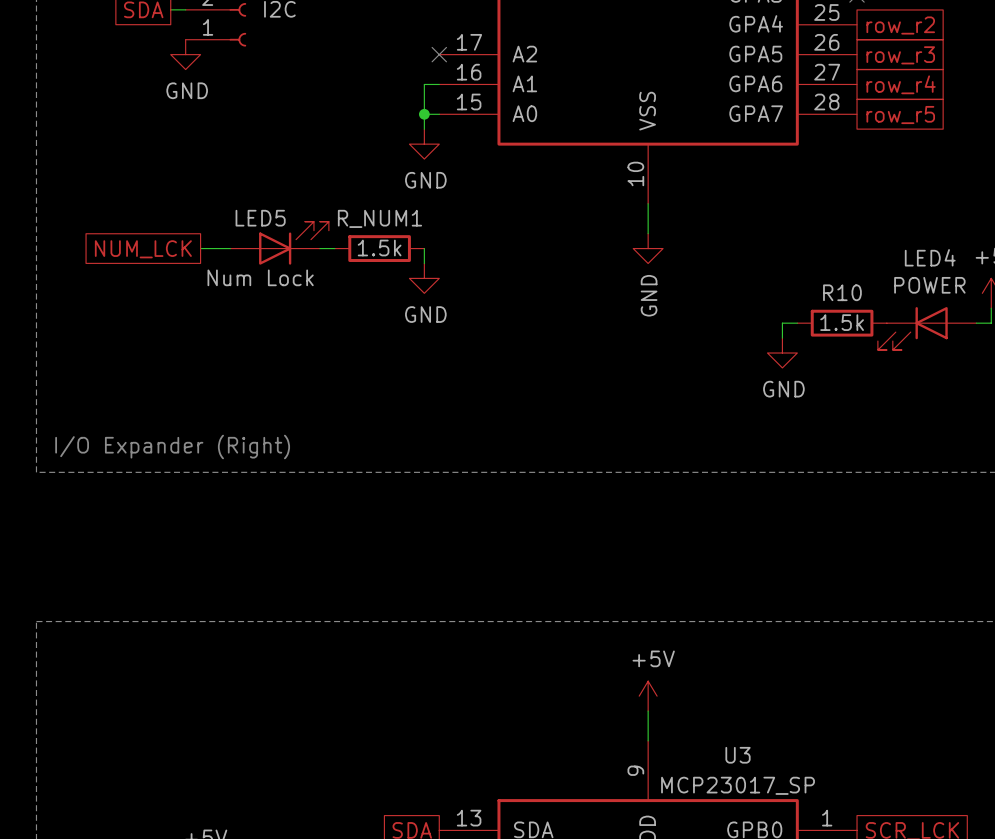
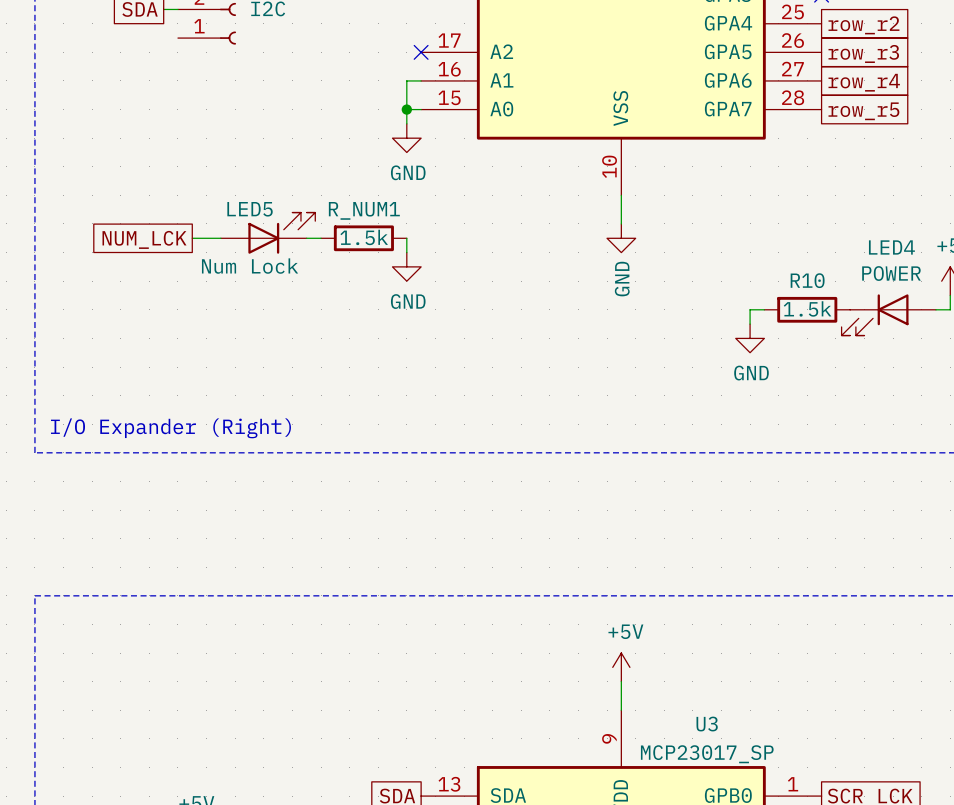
power symbol: GND (185, 54) -> none

